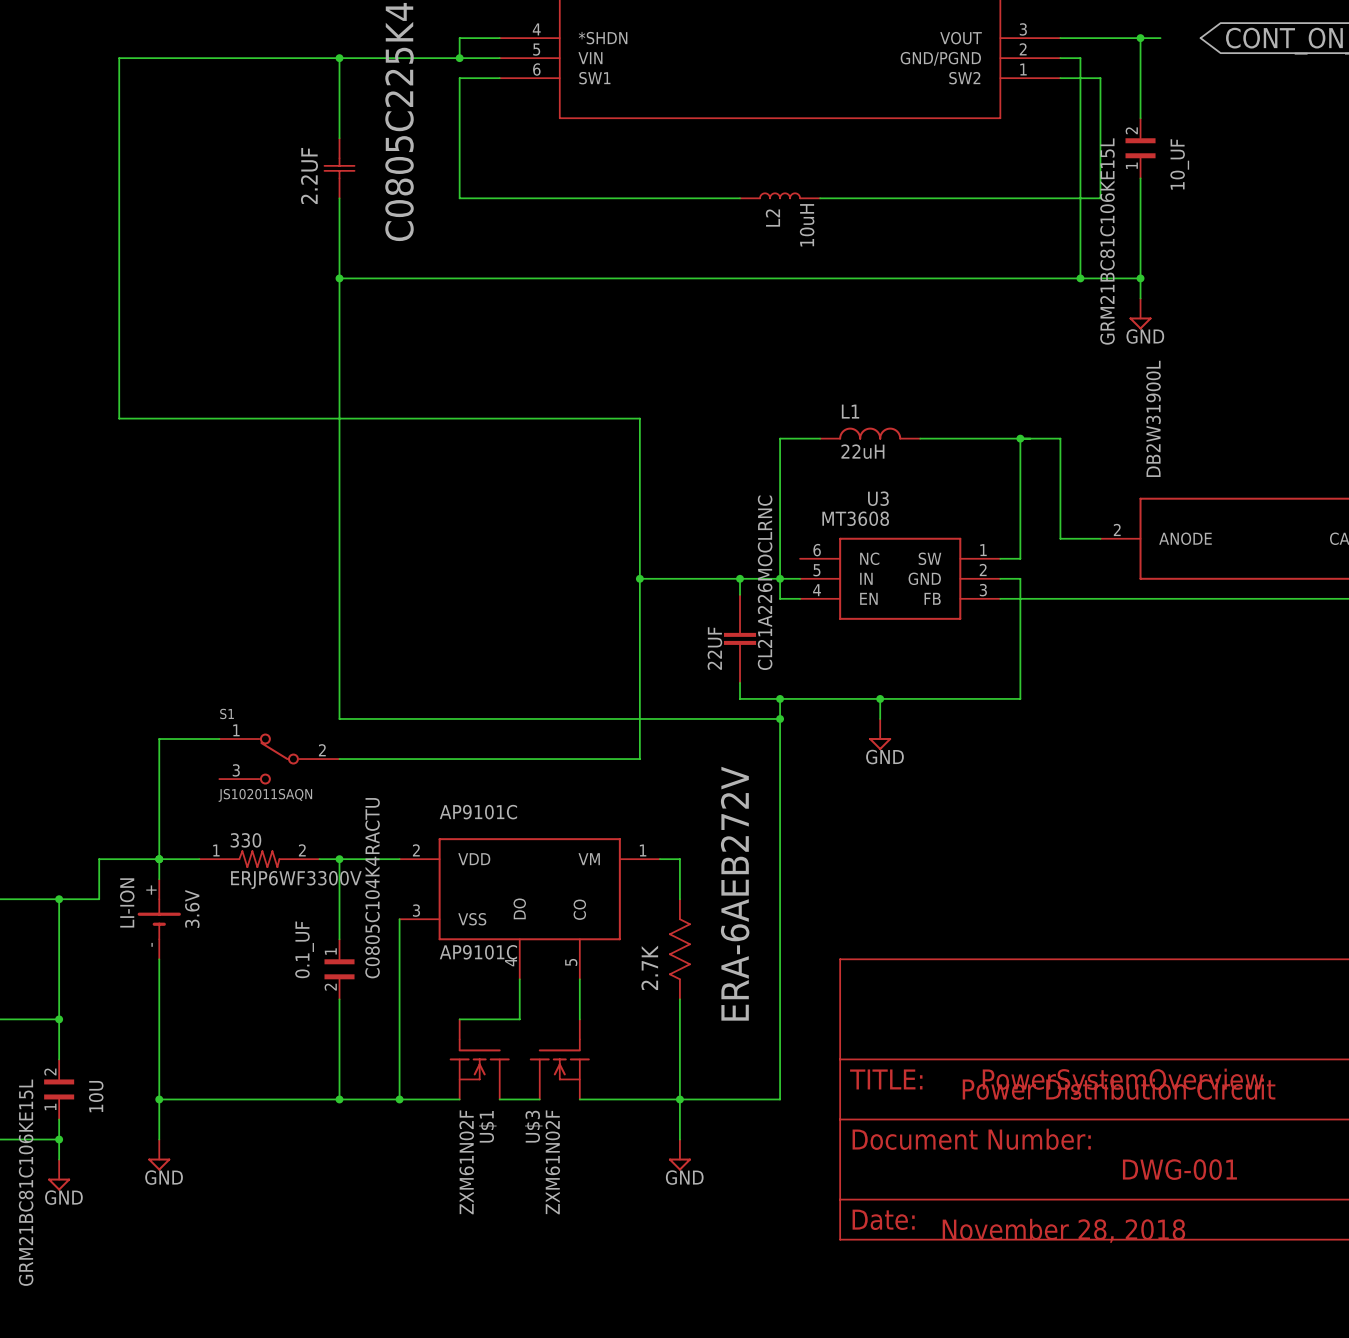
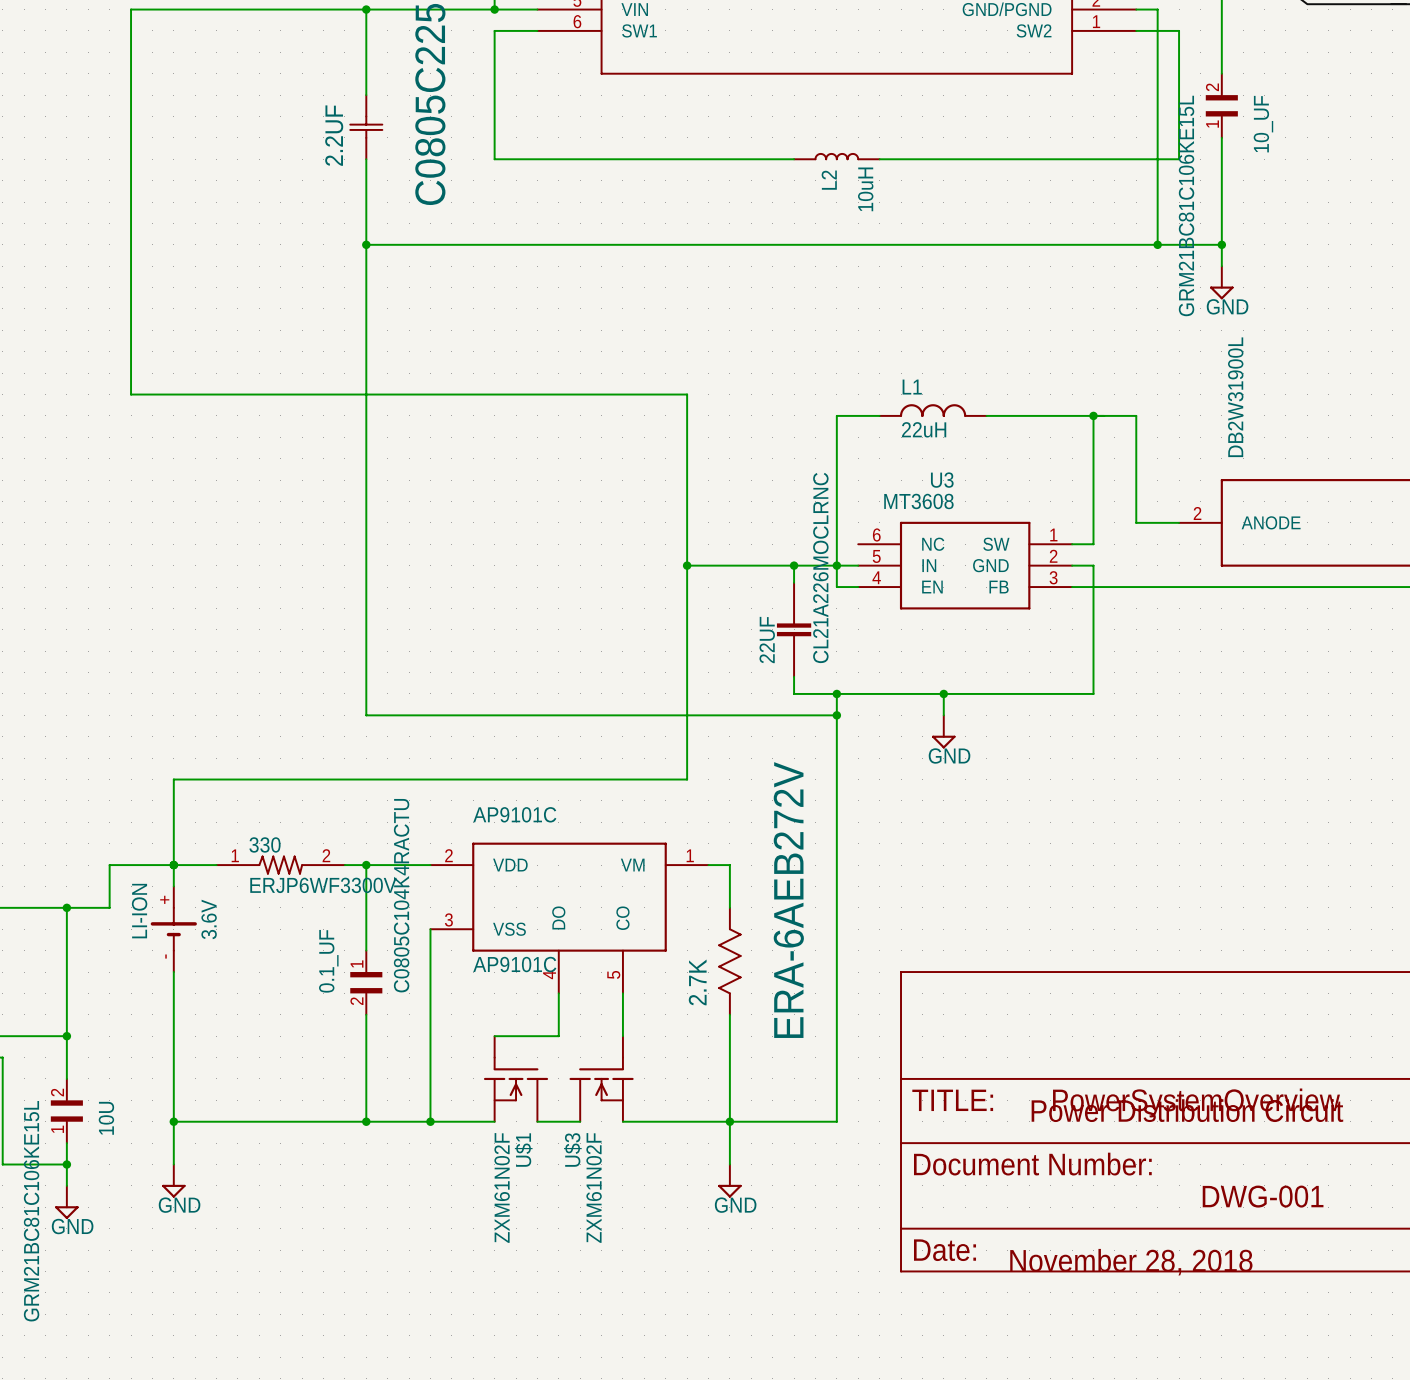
wire: (219, 739) (159, 739) (159, 779) -> none
S1: JS102011SAQN (279, 759) -> none
wire: (339, 759) (639, 759) -> (173, 779) (687, 779) (687, 758)

